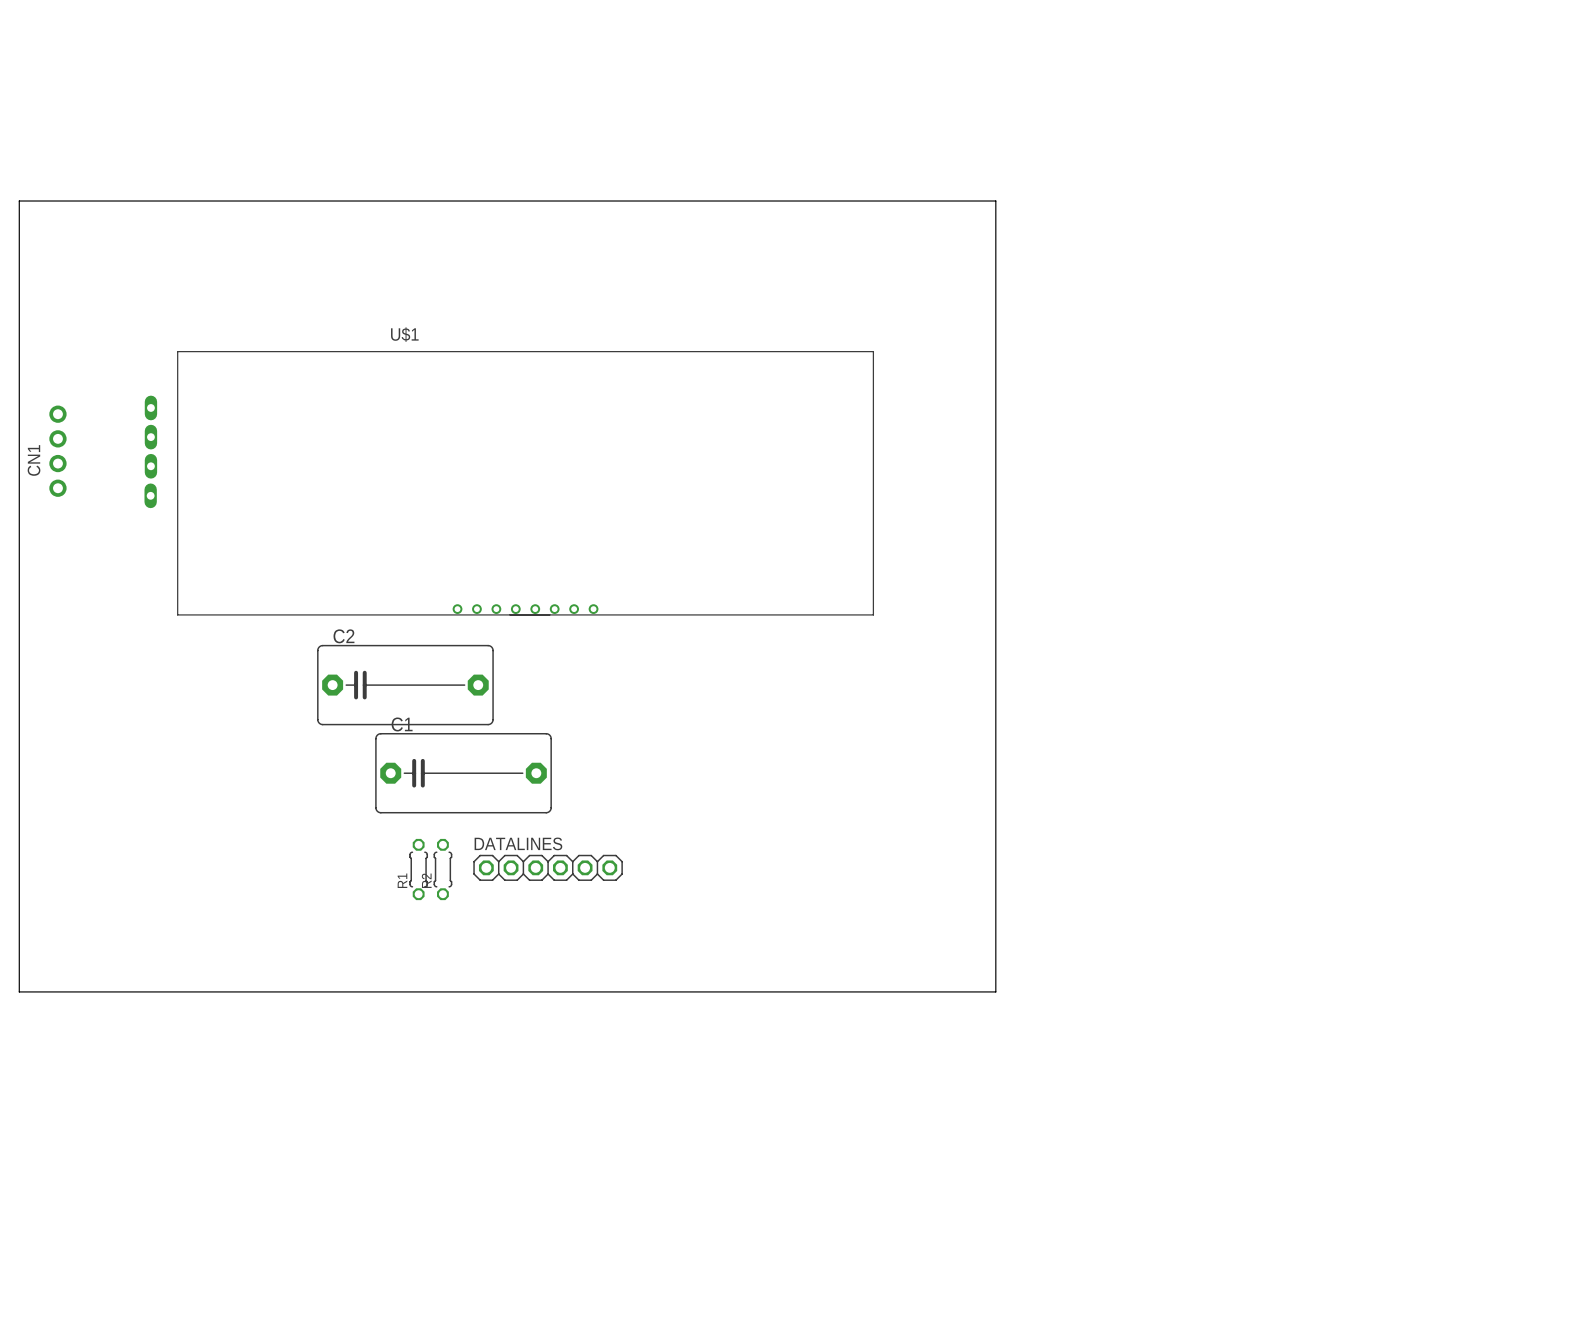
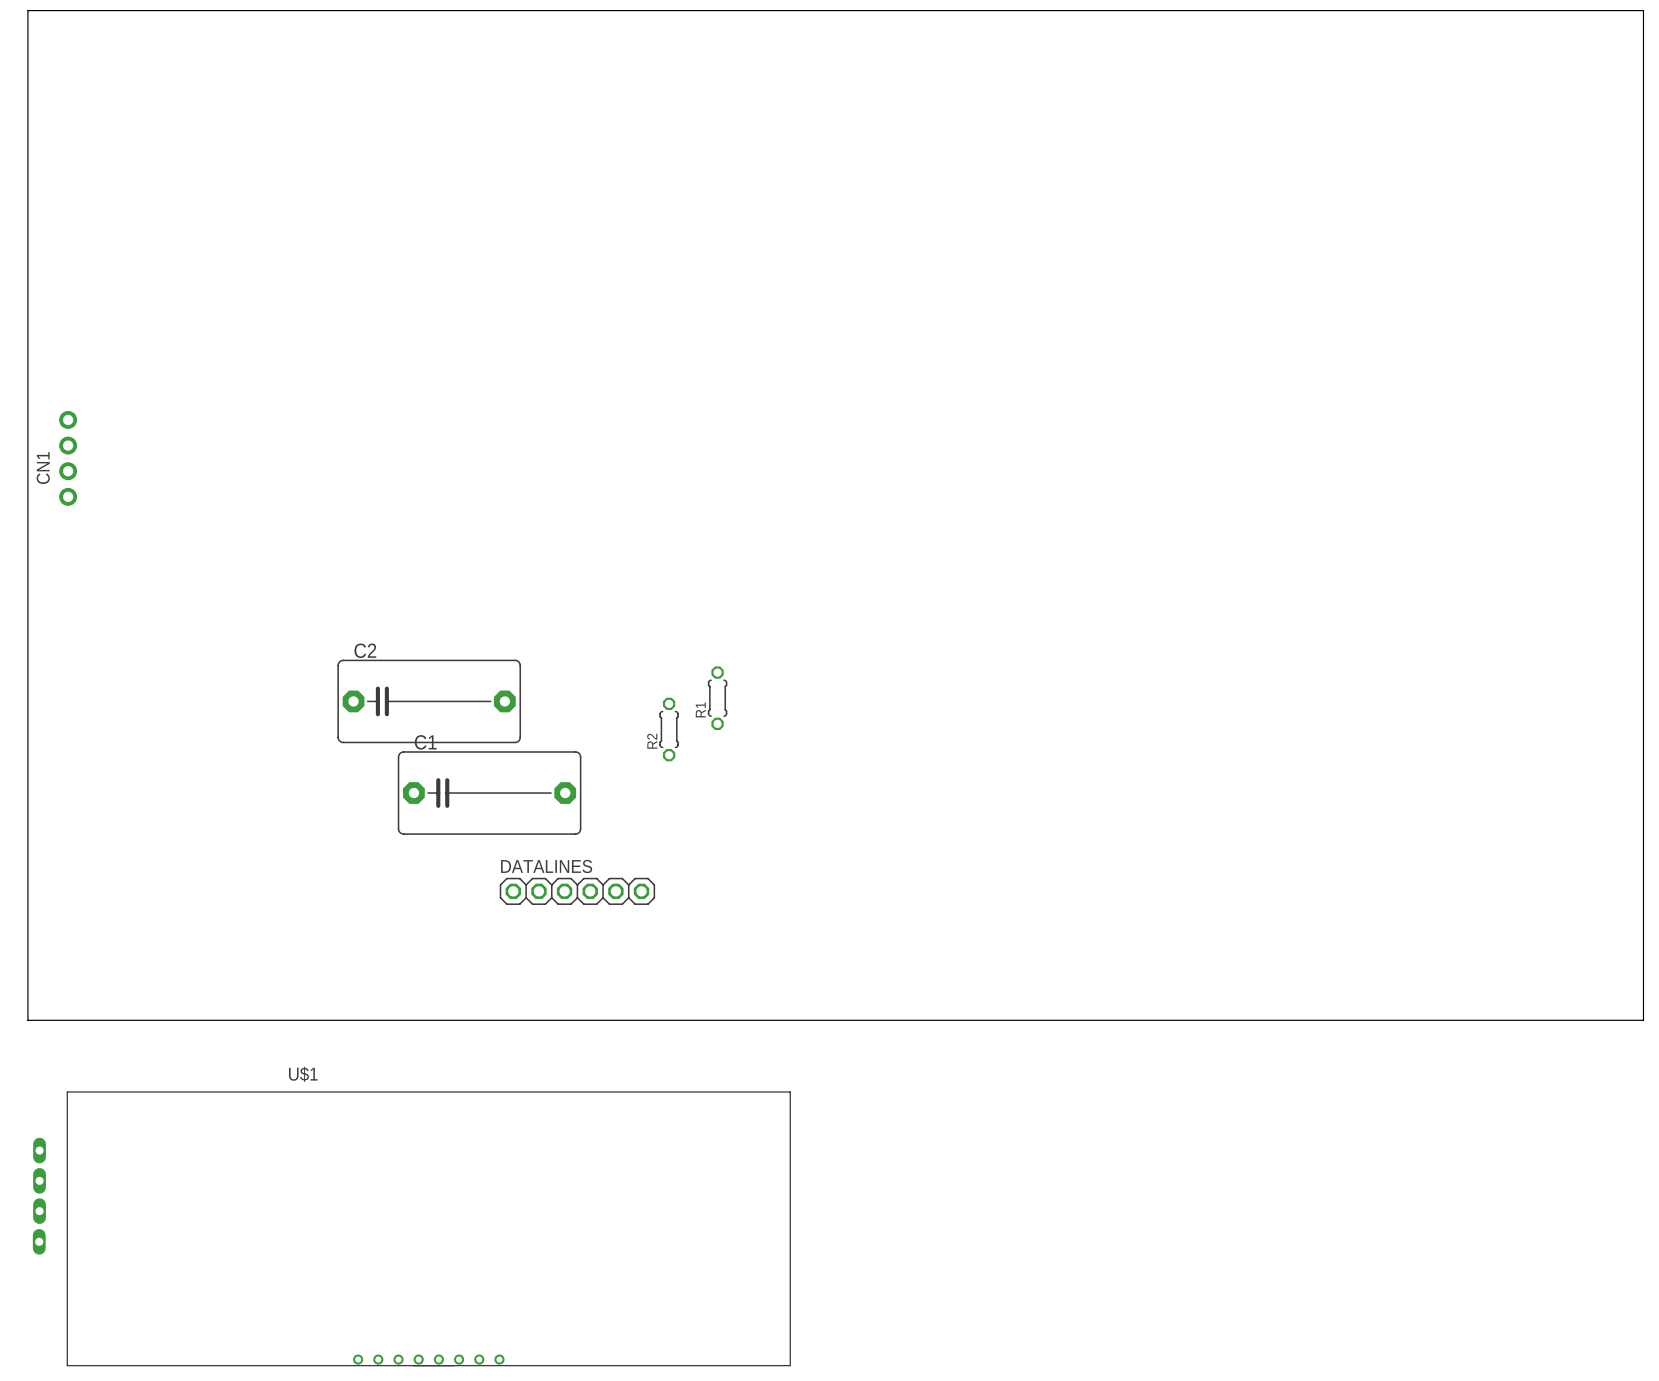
board edge: (19, 201) (995, 201) (995, 991) -> (27, 198) (27, 10) (1643, 10) (1643, 1020) (1042, 1020)
U$1 position: (509, 483) -> (411, 1228)
R1 position: (418, 869) -> (717, 698)
R2 position: (442, 869) -> (669, 729)

